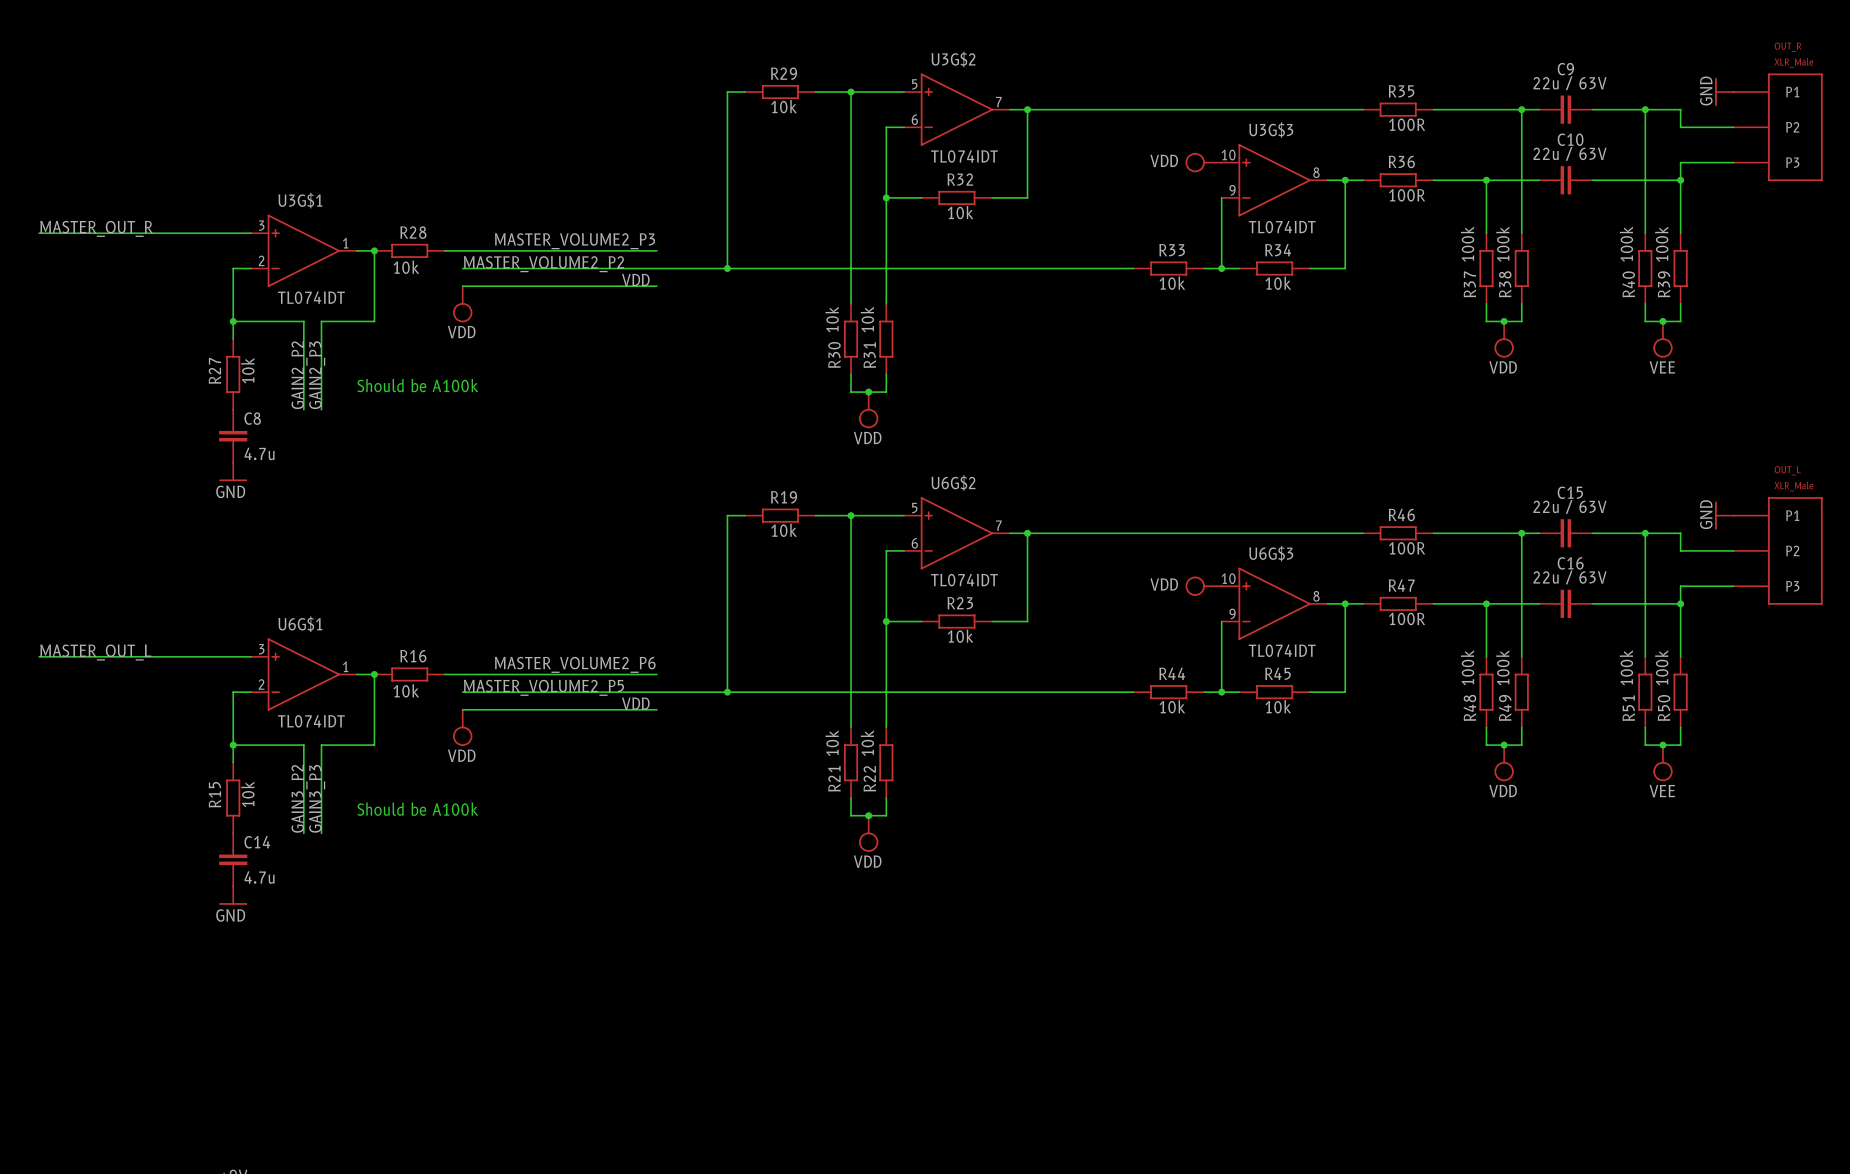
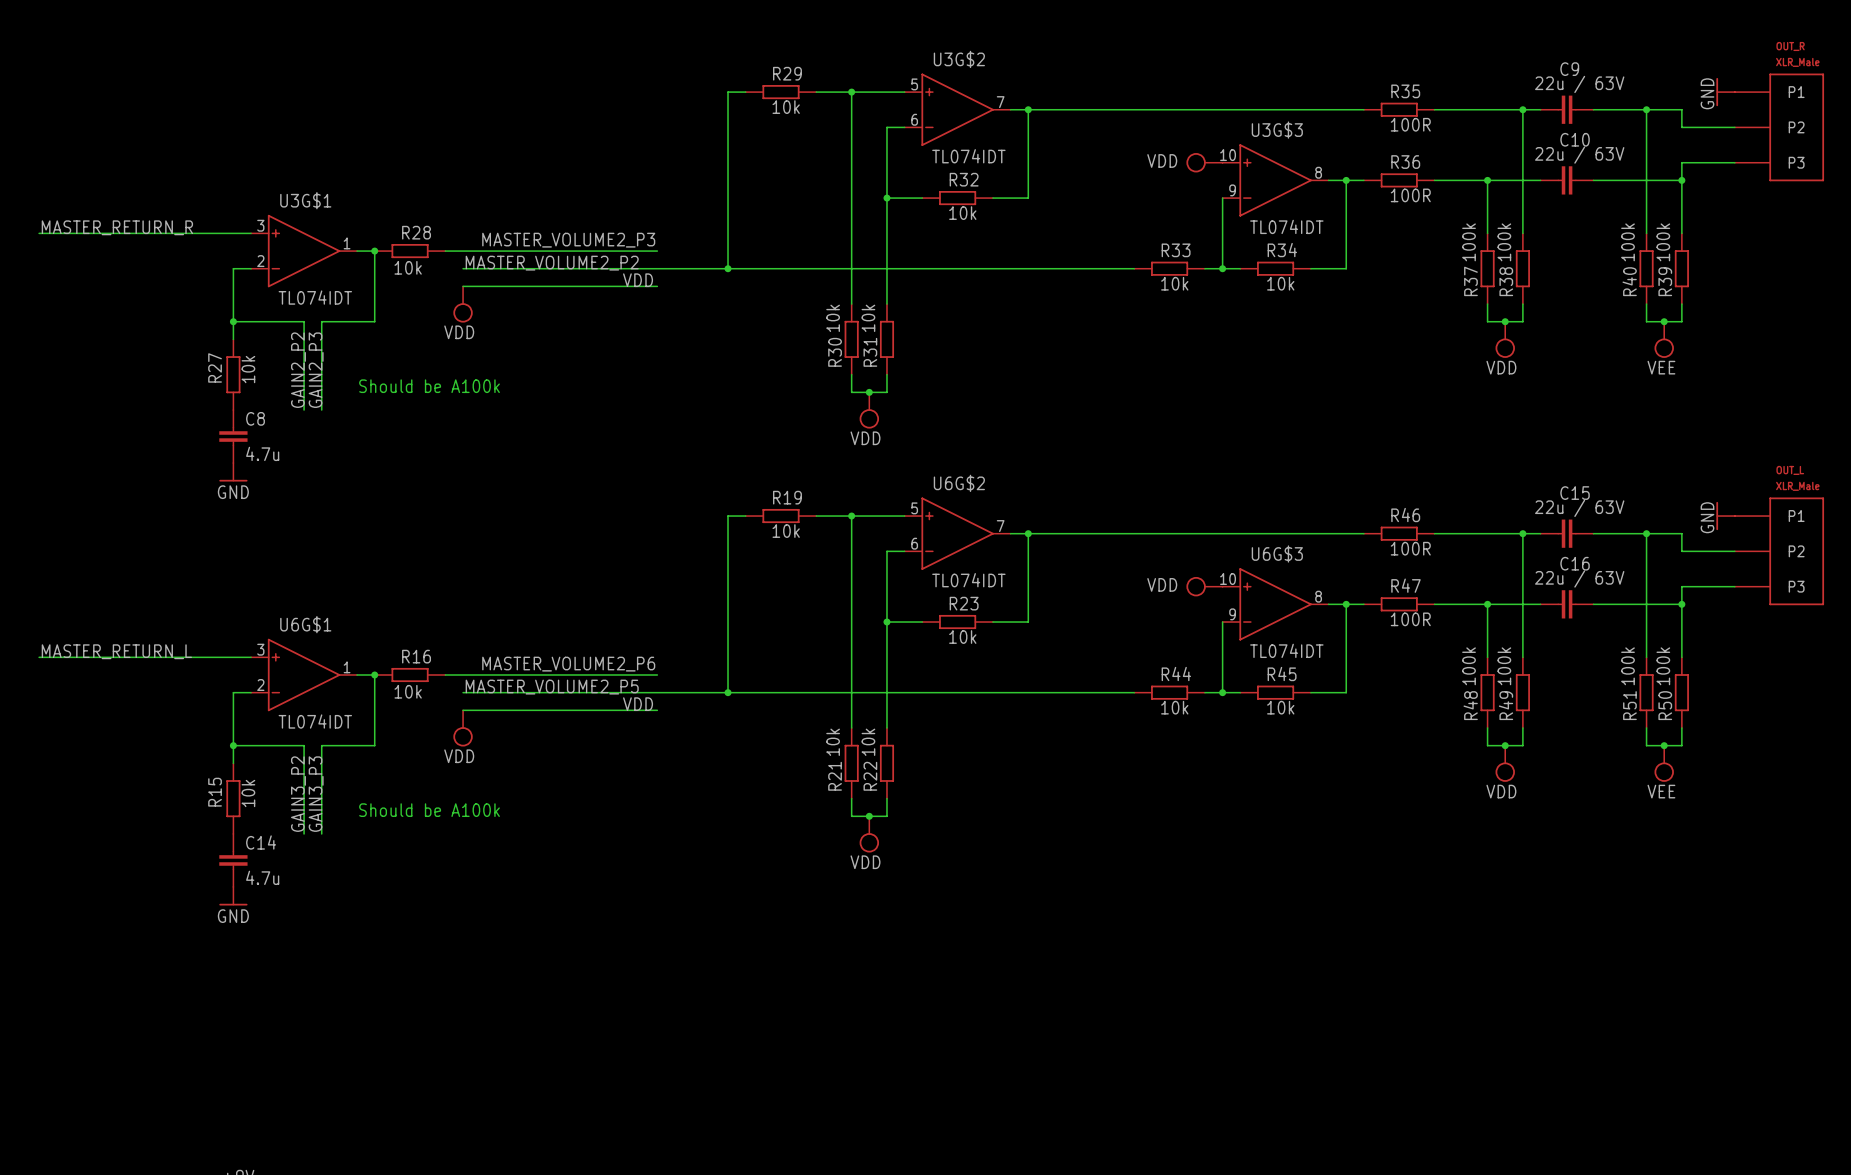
label: MASTER_OUT_R (96, 228) -> MASTER_RETURN_R (117, 227)
label: MASTER_OUT_L (95, 652) -> MASTER_RETURN_L (116, 651)

